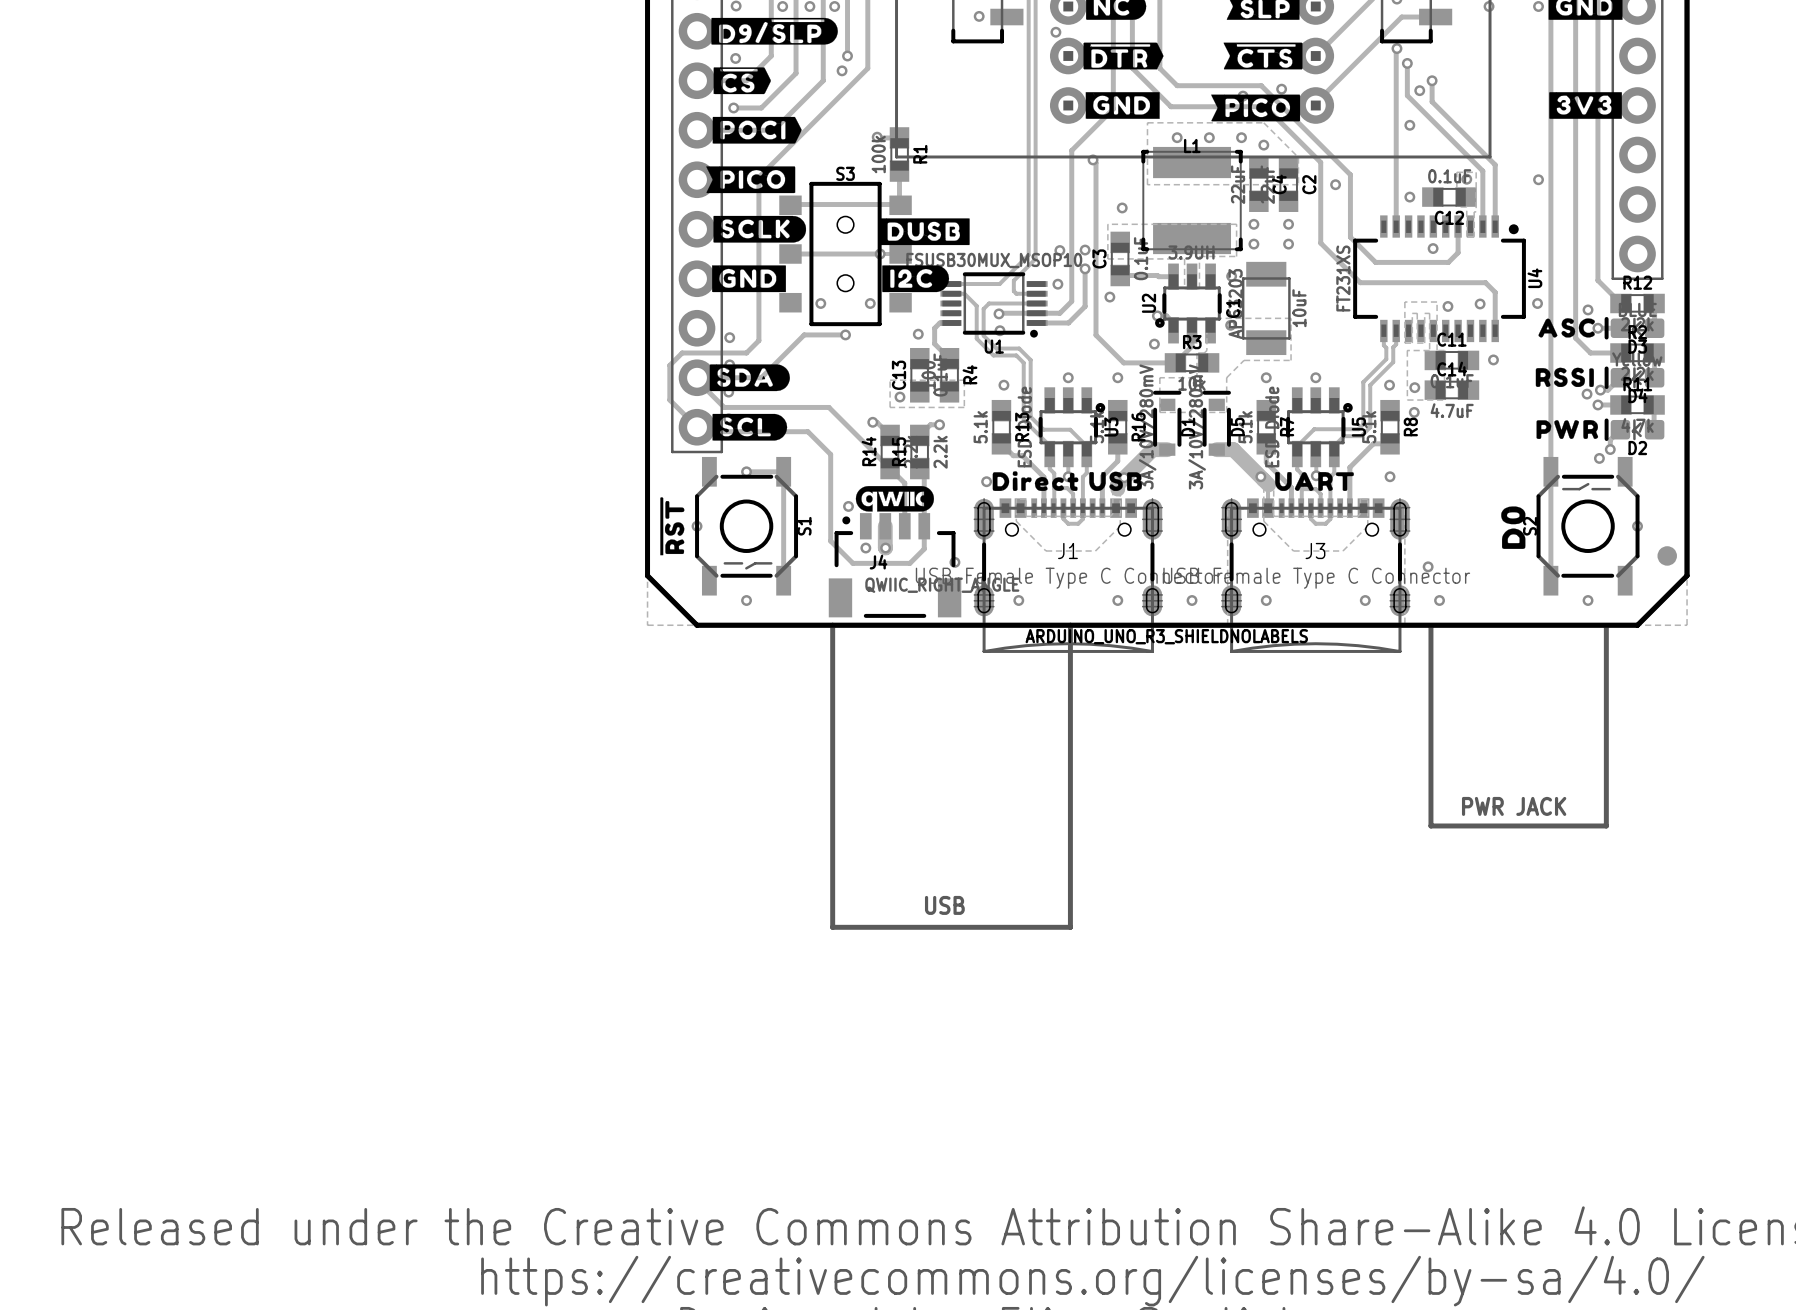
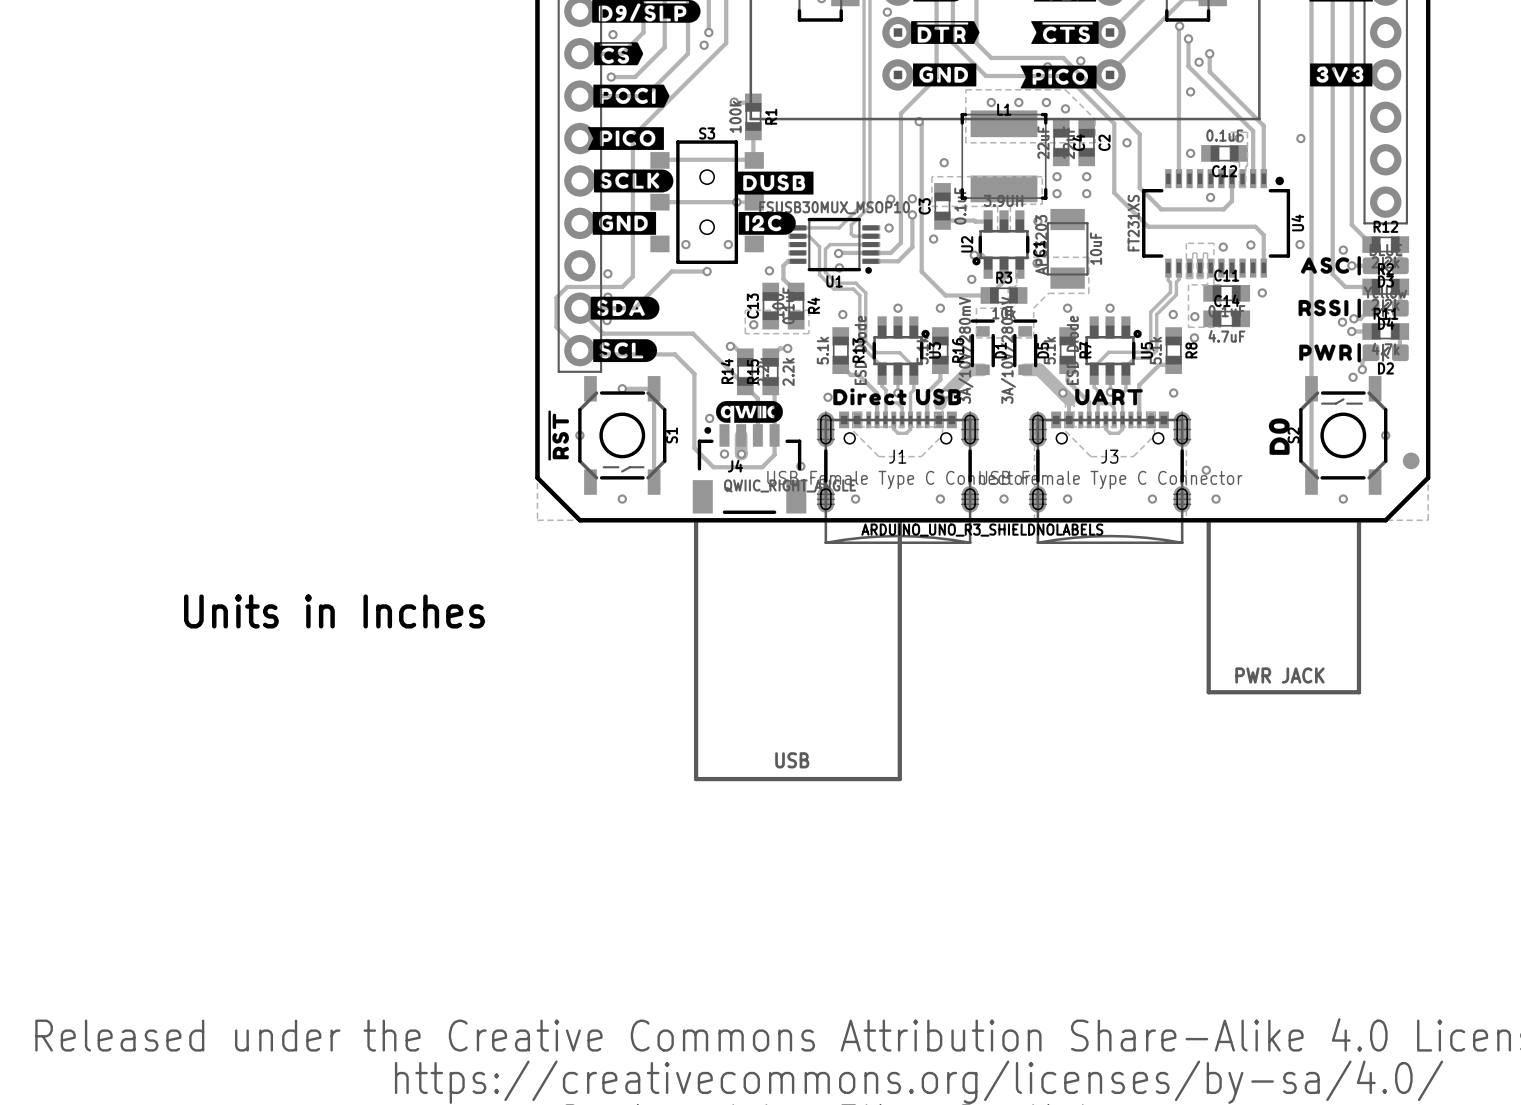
text: none -> Units in Inches (334, 611)

